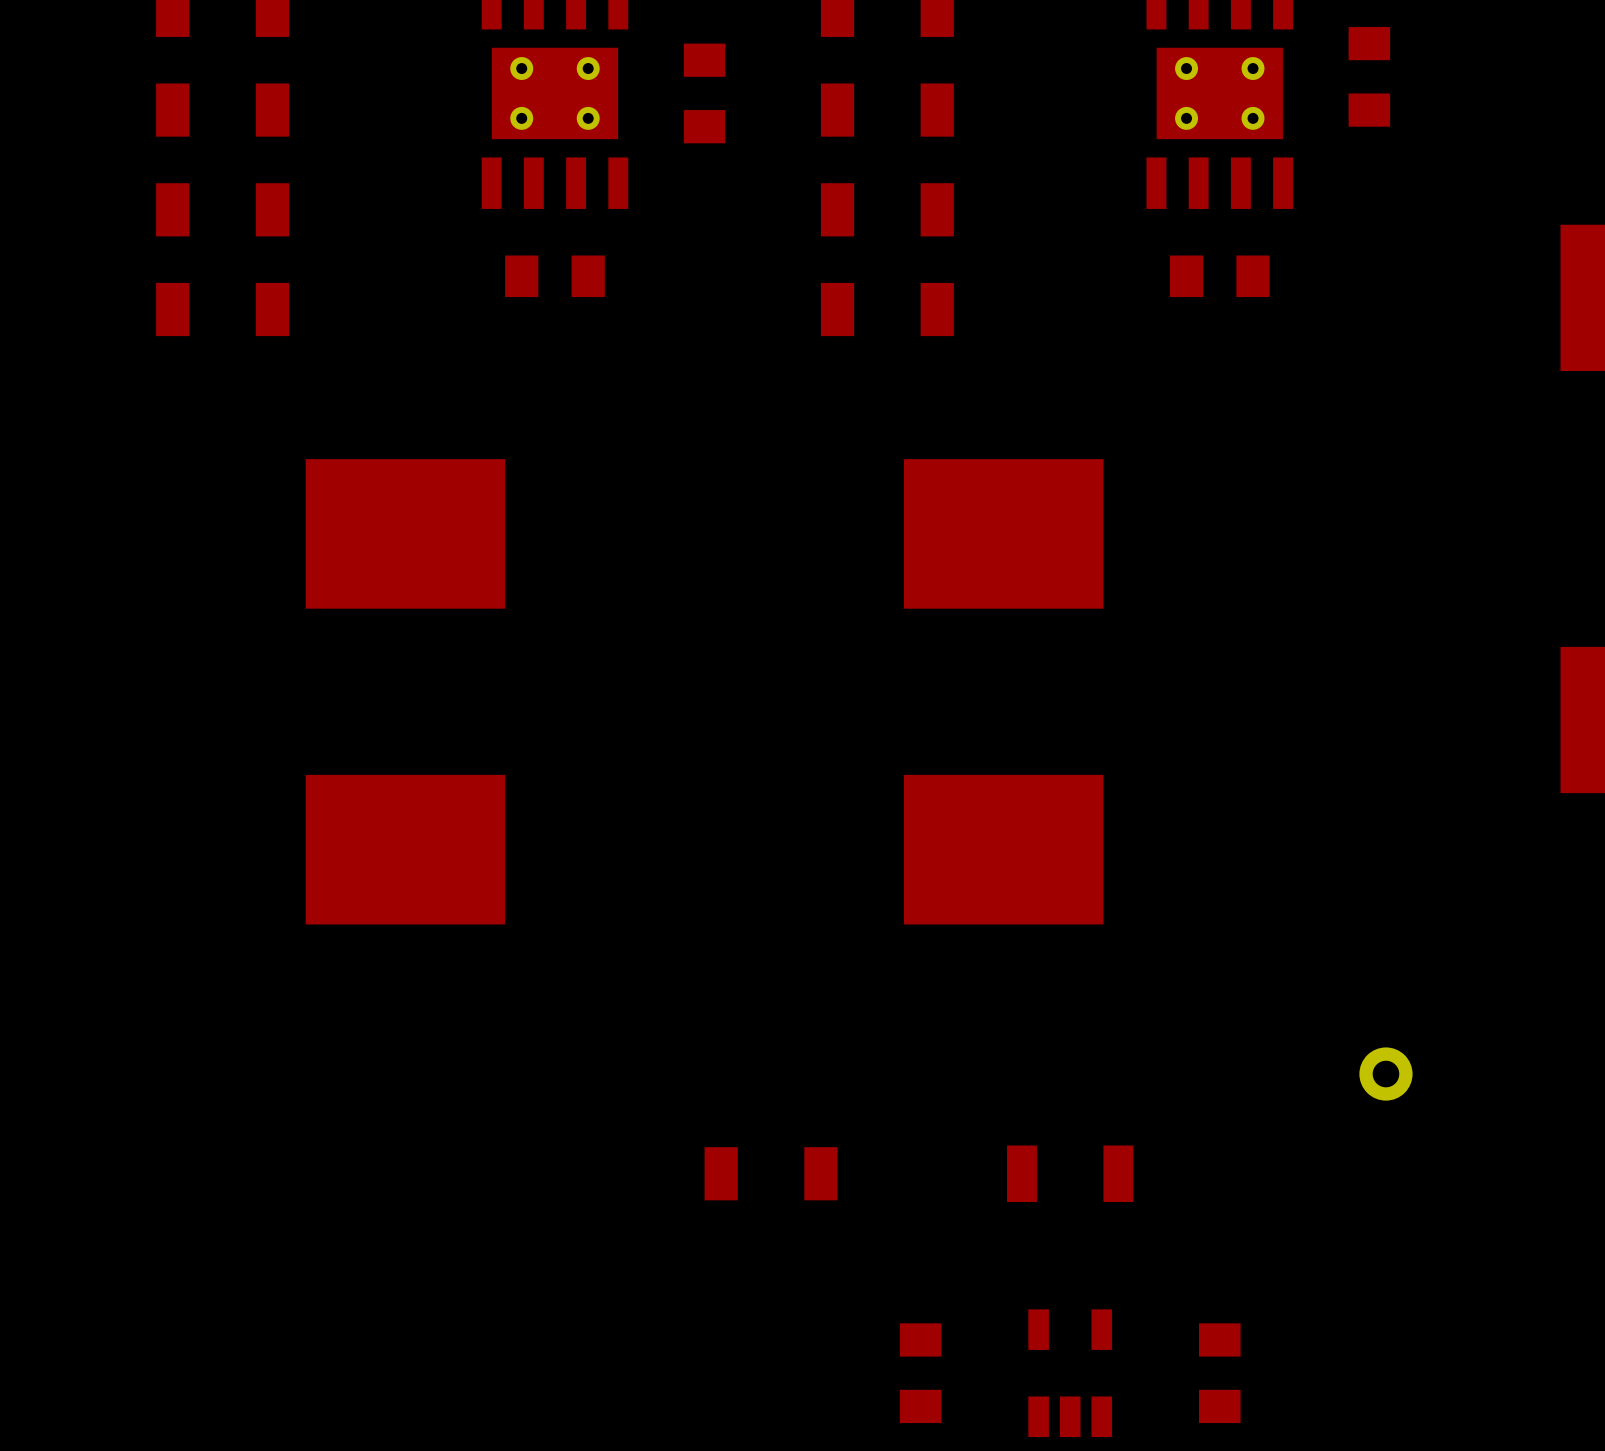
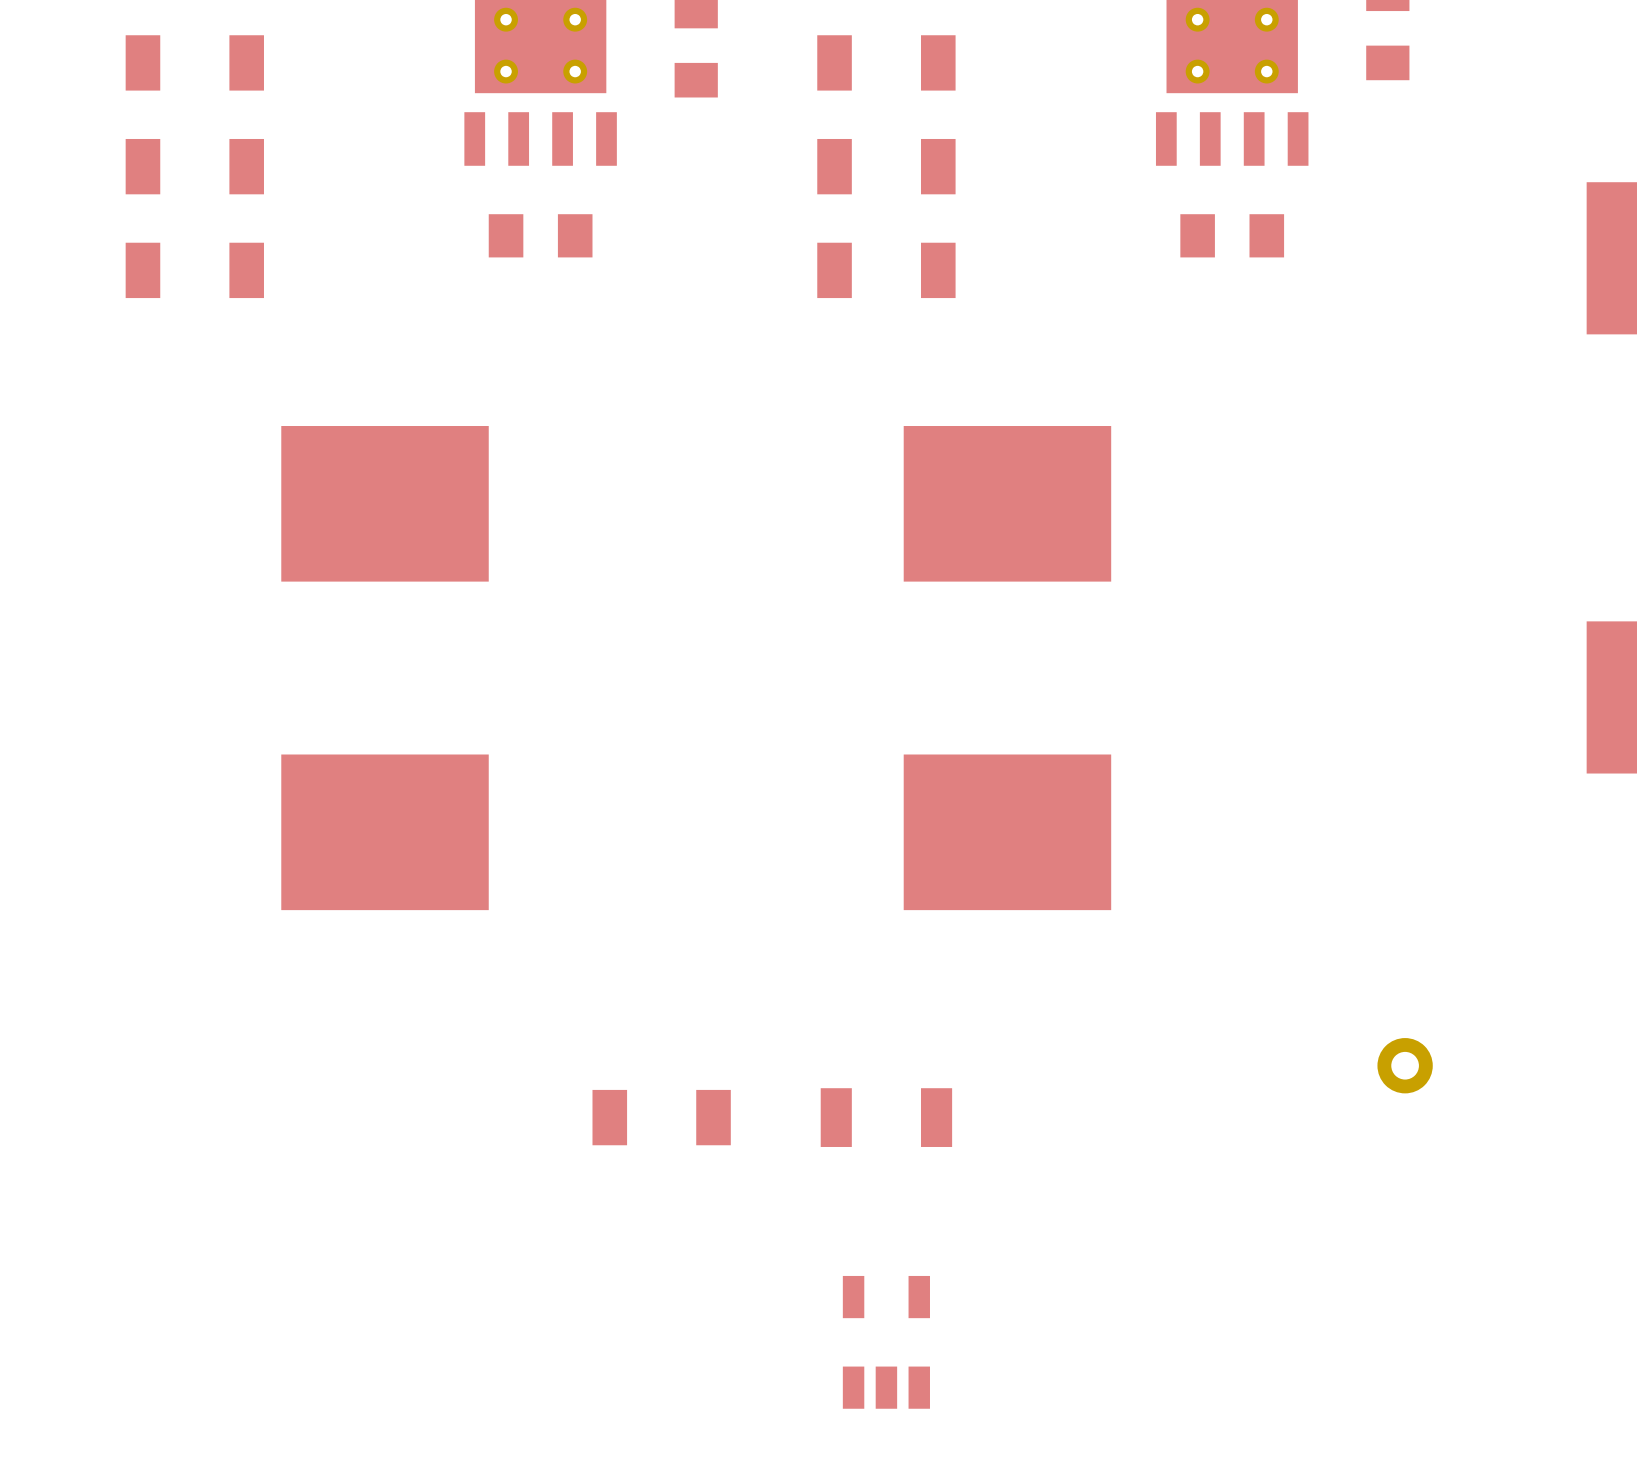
part position: (771, 1173) -> (661, 1117)
part position: (1070, 1173) -> (886, 1117)
part: (920, 1373) -> none
part position: (1070, 1373) -> (886, 1342)
part: (1219, 1373) -> none

